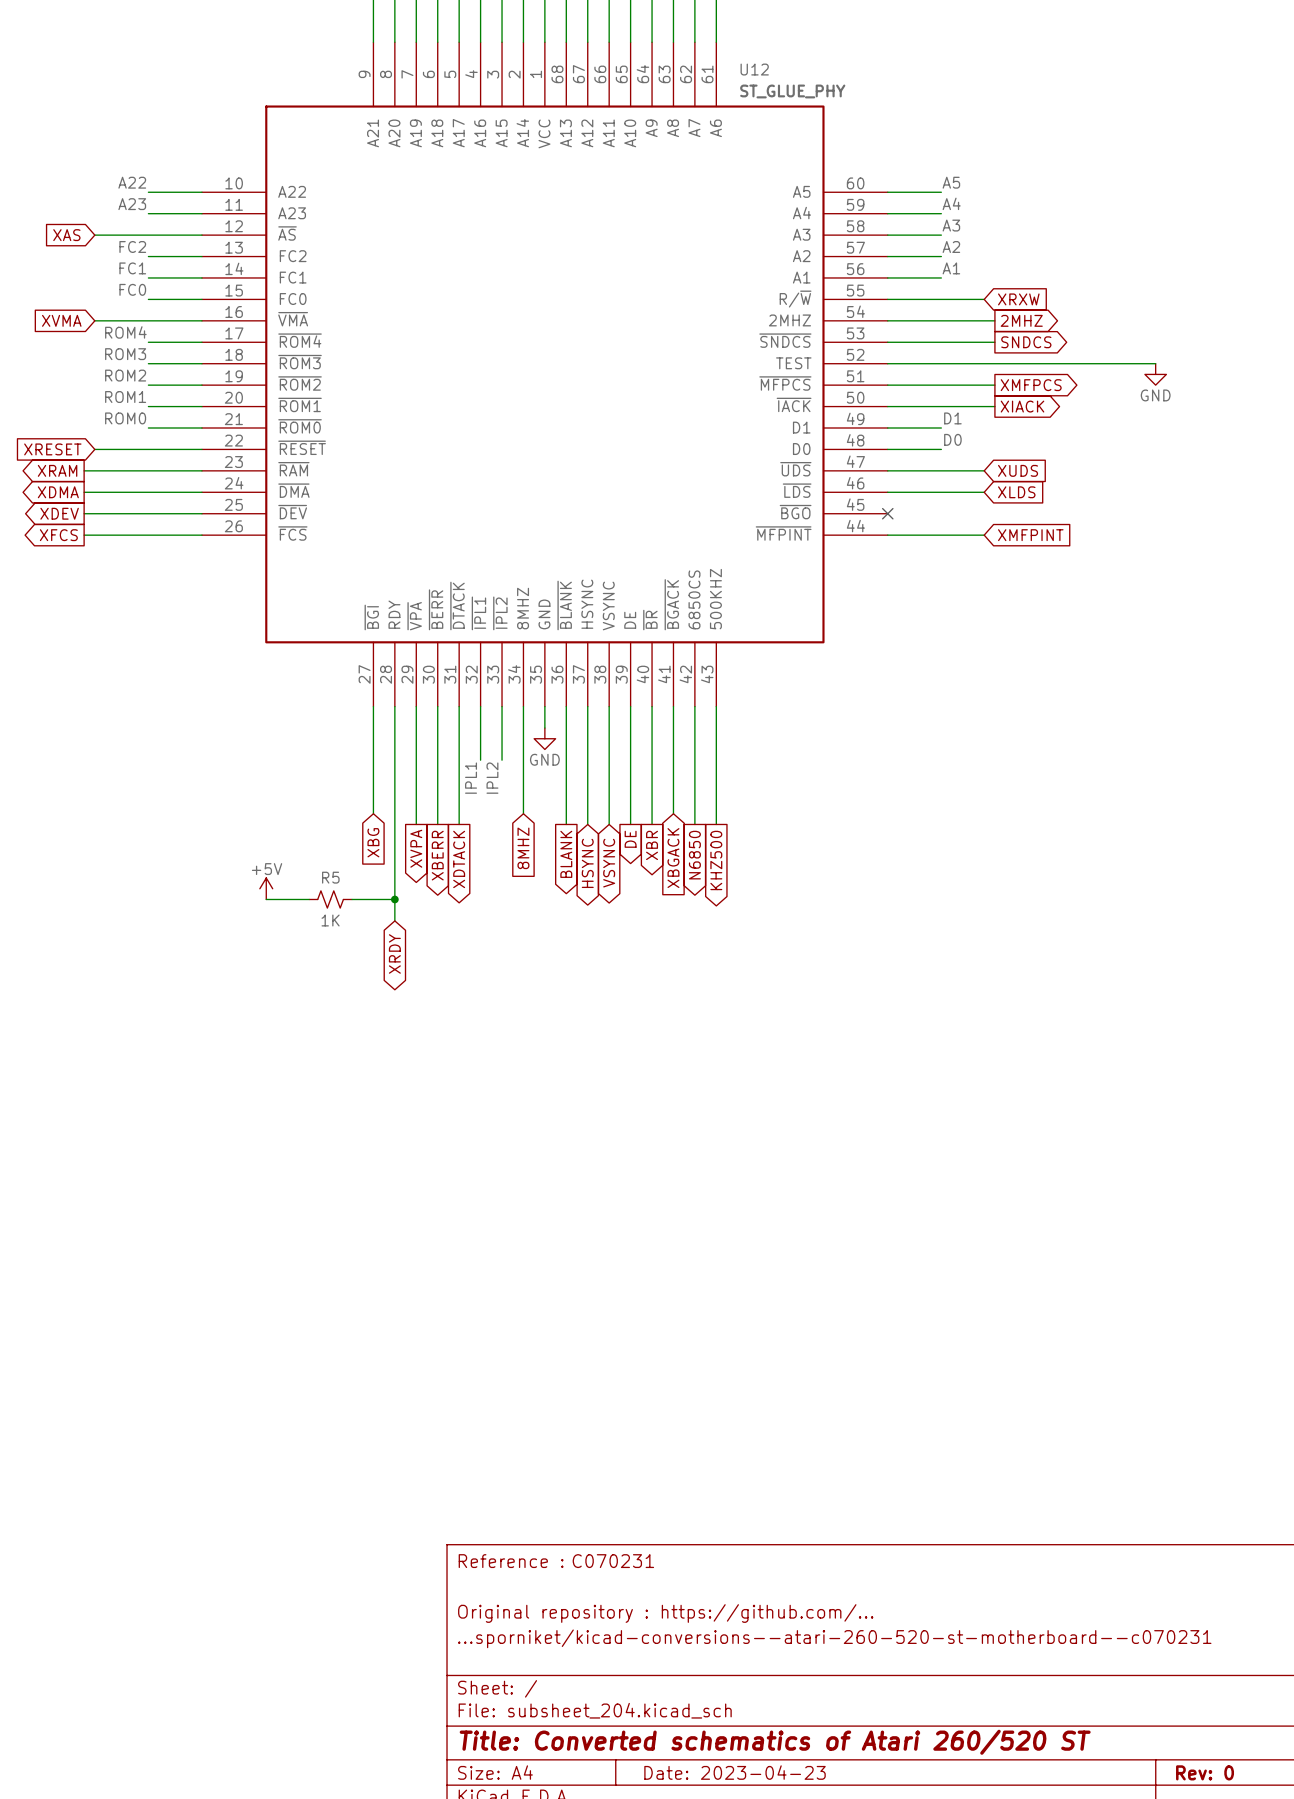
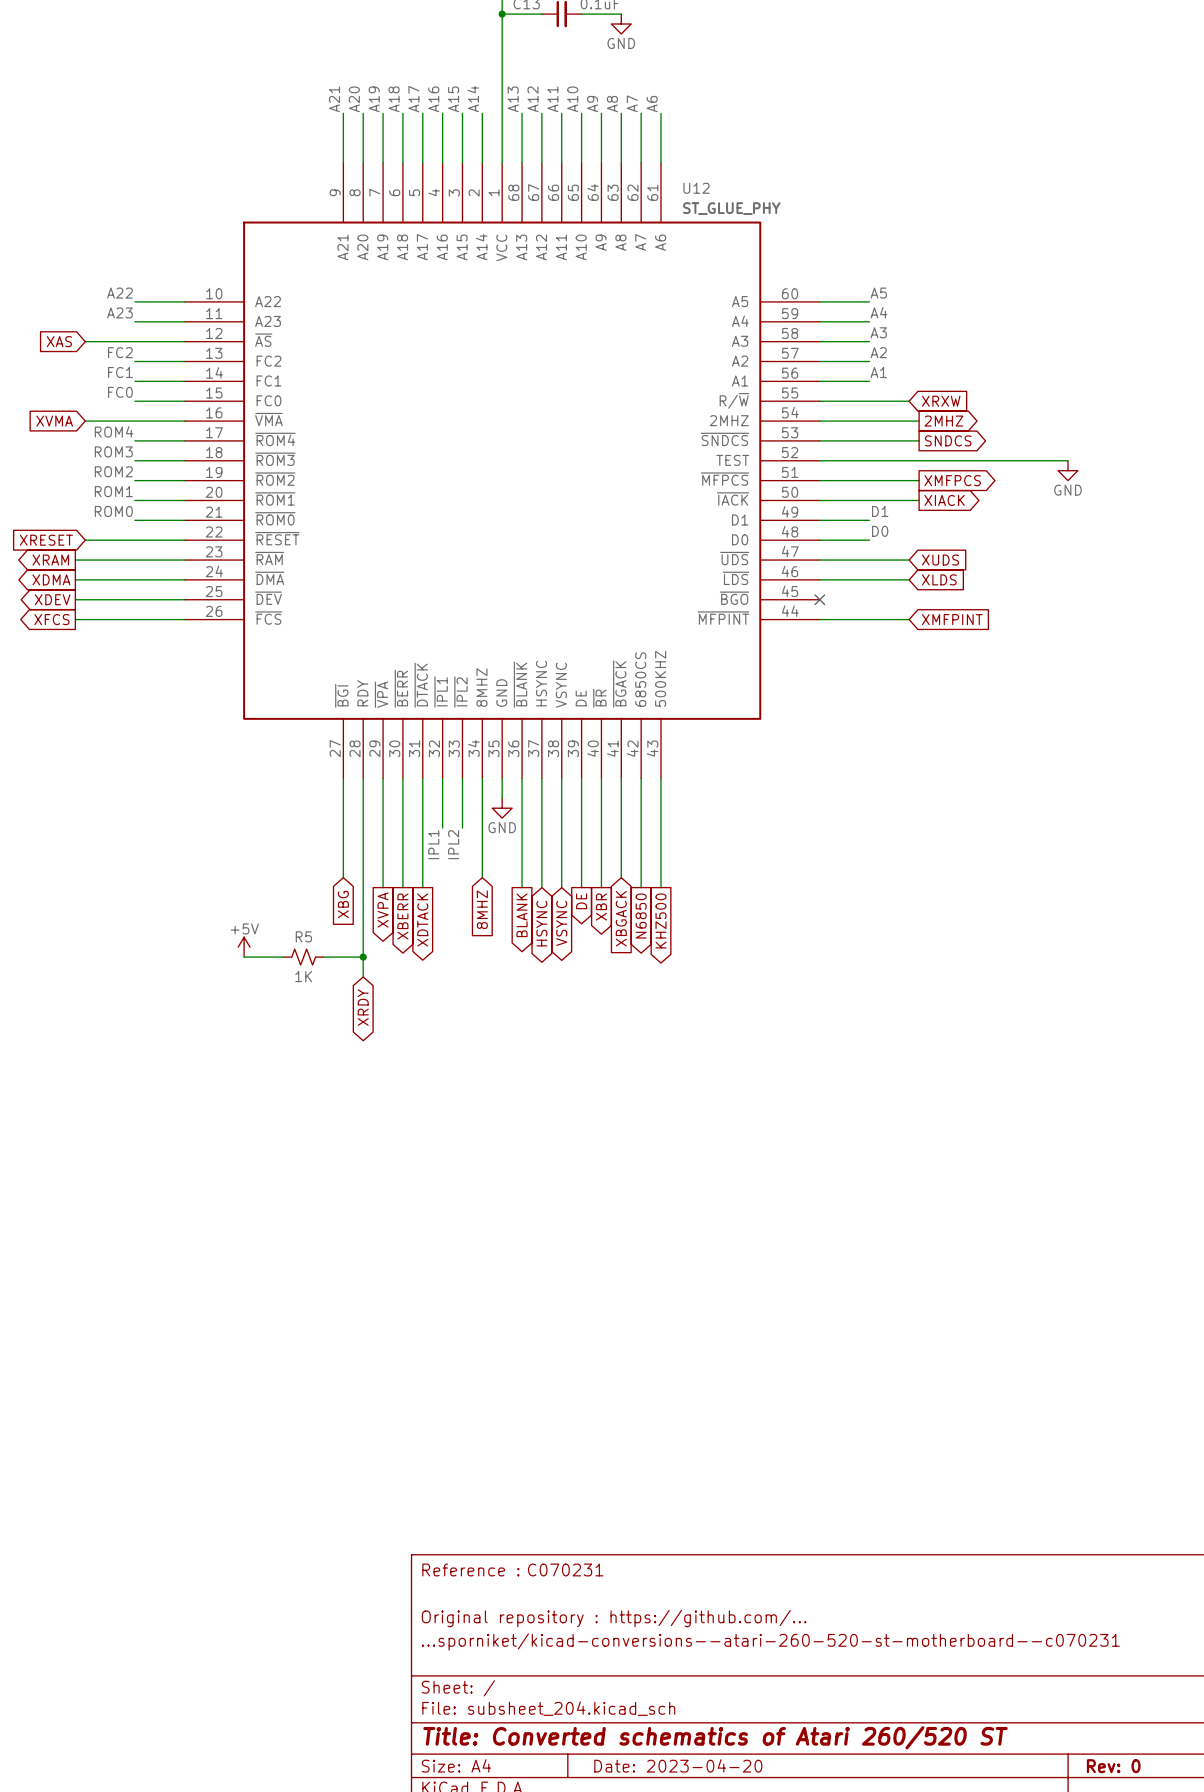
title block: Date: 2023-04-23 (735, 1772) -> Date: 2023-04-20 (678, 1765)

